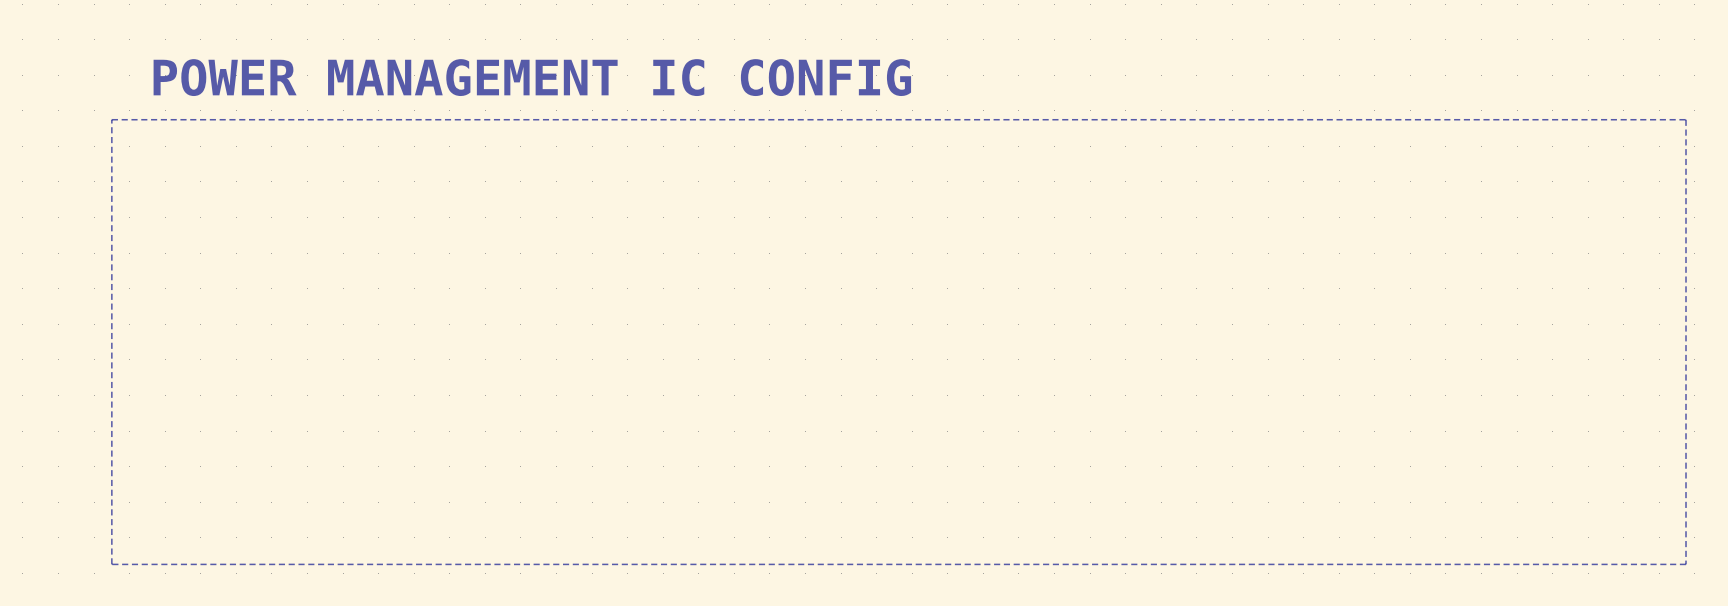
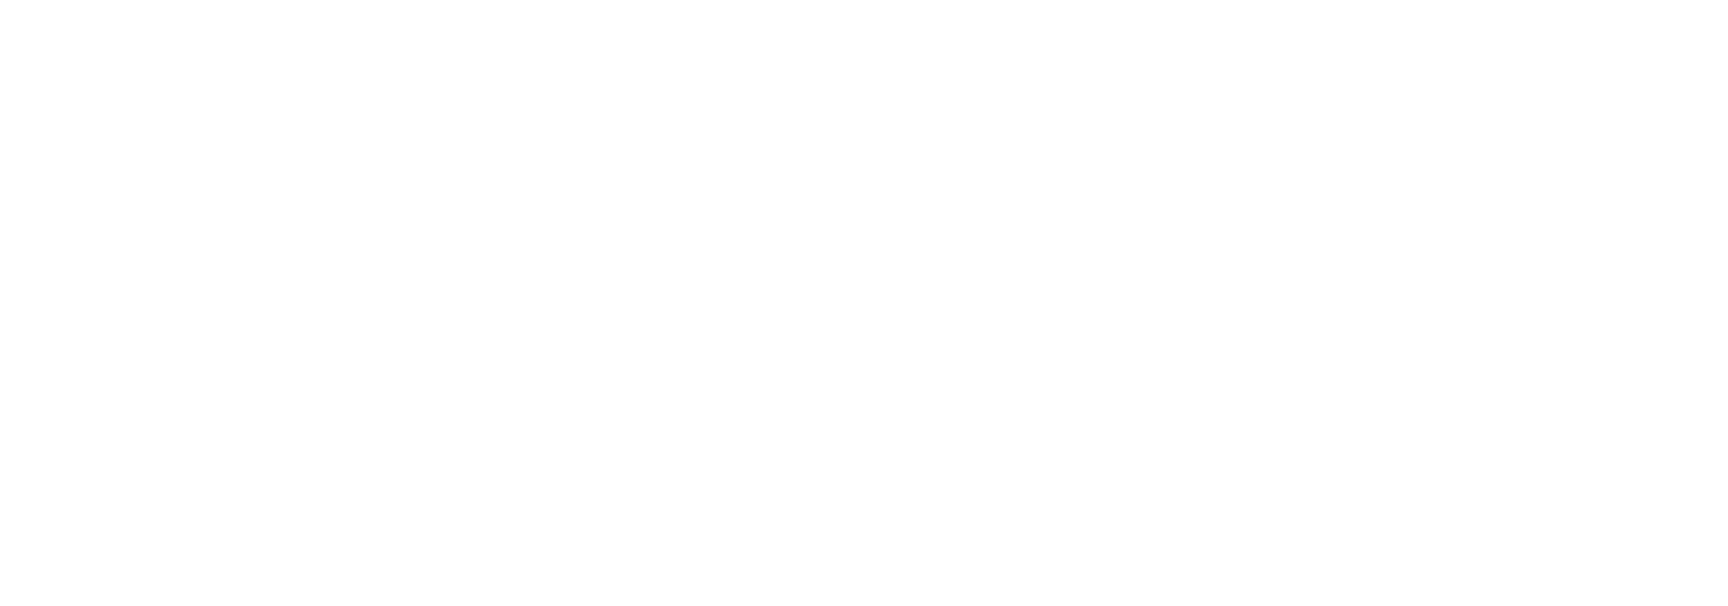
text: POWER MANAGEMENT IC CONFIG (532, 77) -> none
line: (111, 119) (1686, 119) (1686, 564) (111, 564) (111, 119) -> none

